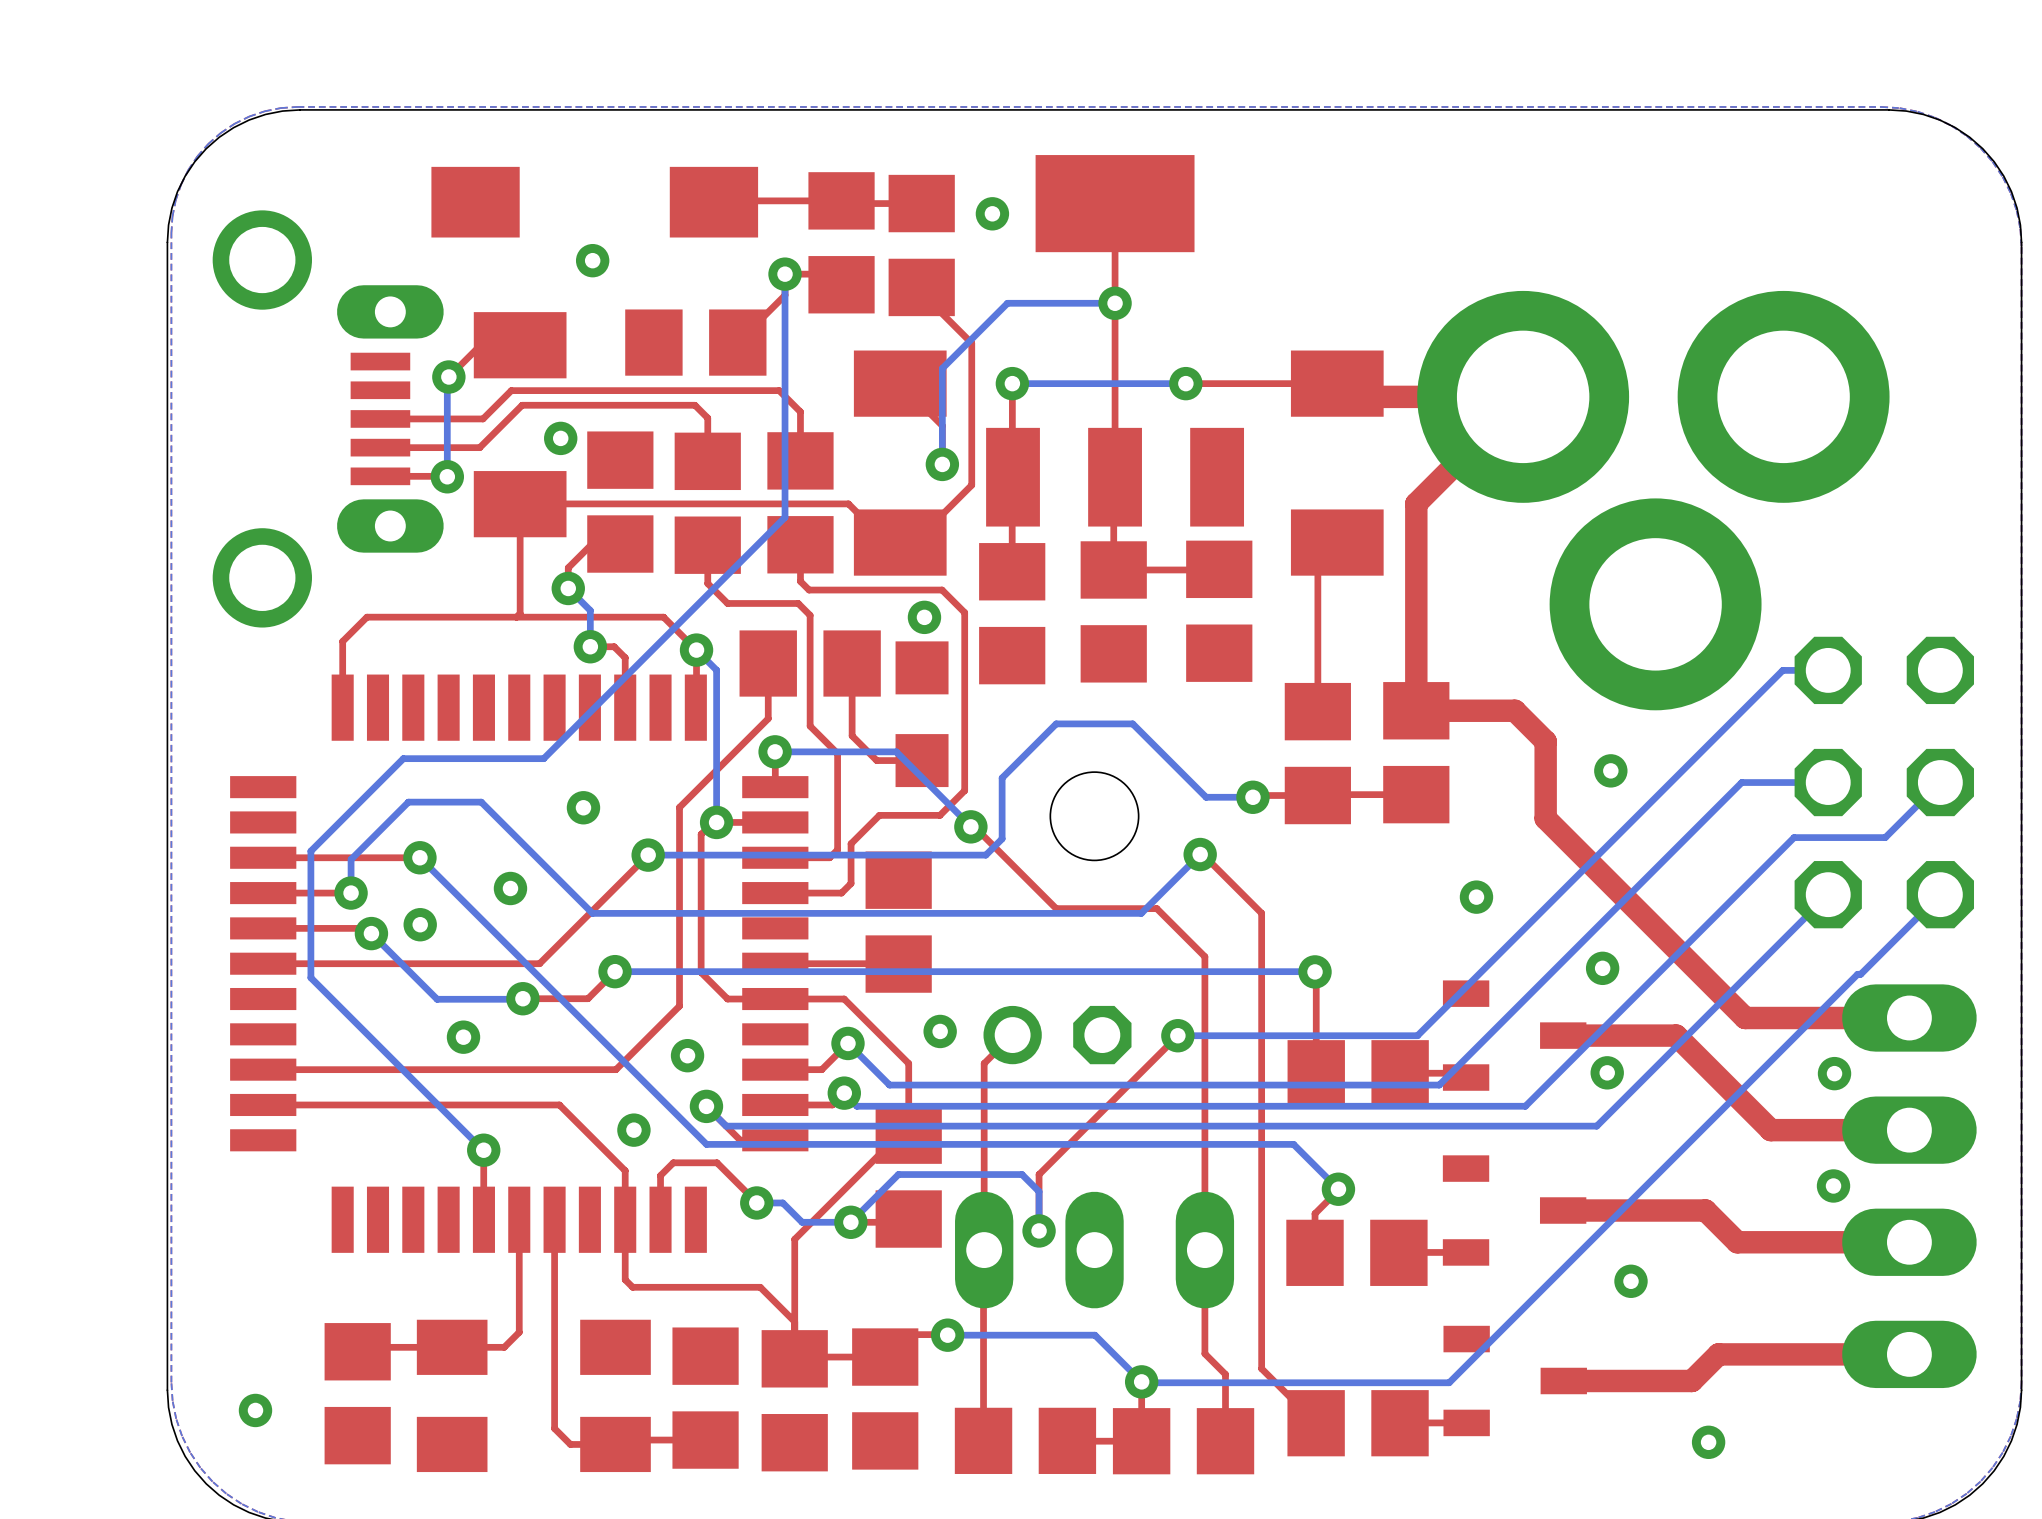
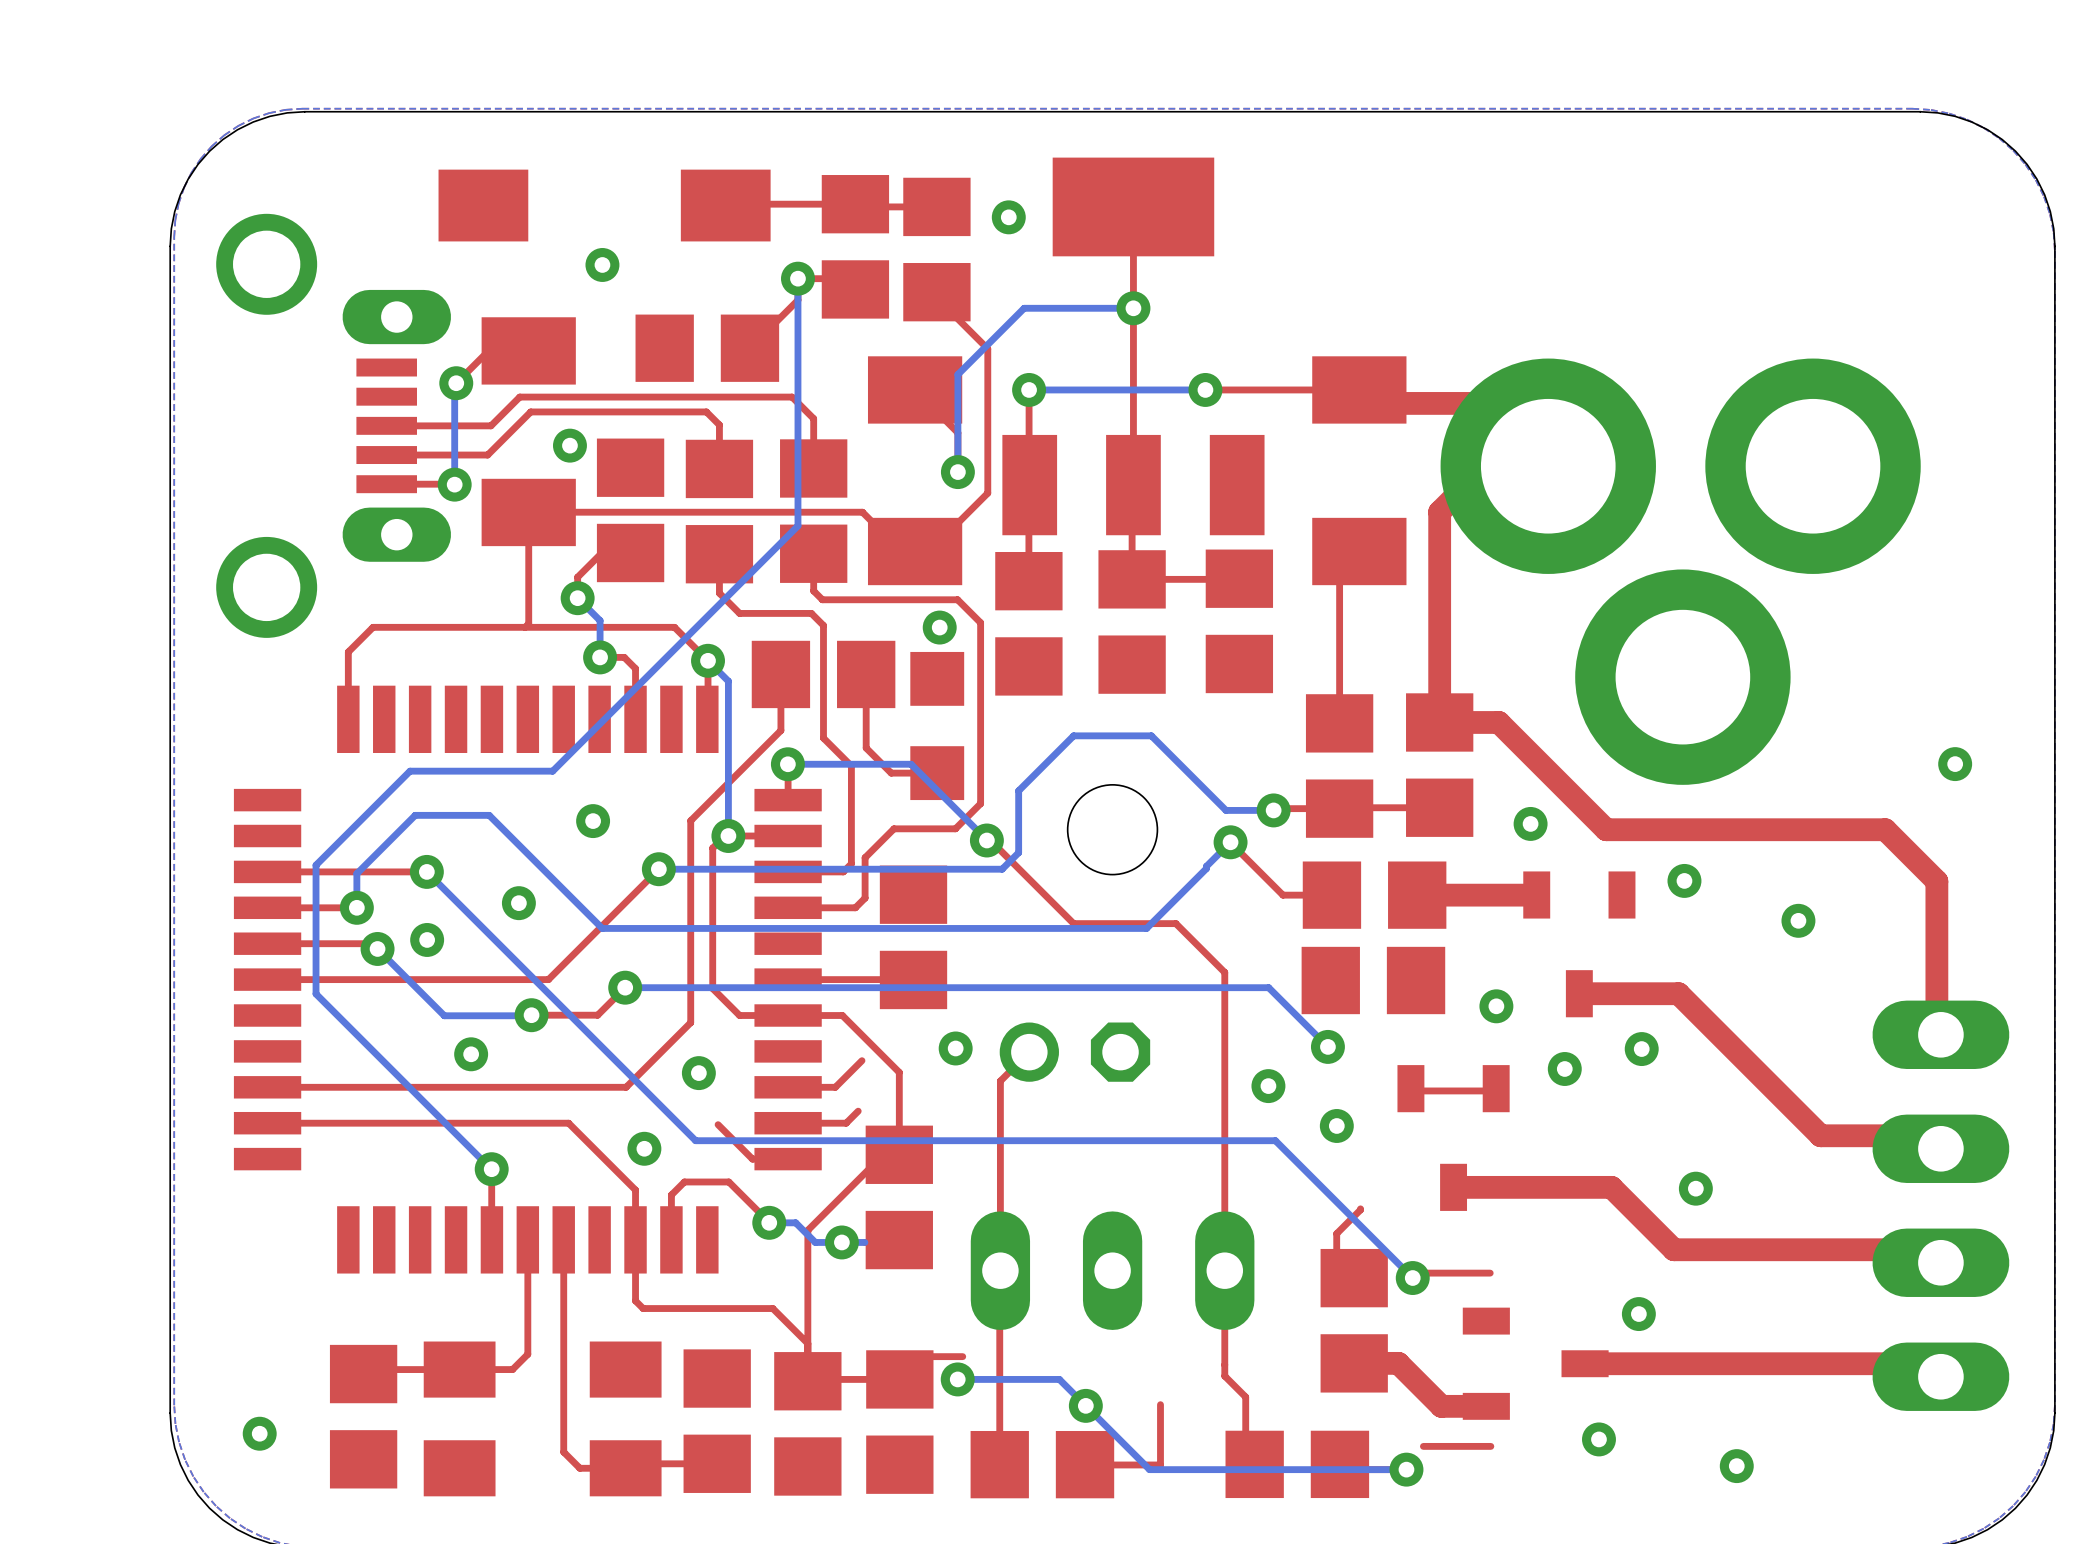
part position: (1653, 500) -> (1680, 571)
bottom track: (1828, 670) (1782, 670) (1417, 1035) (1177, 1035) -> none
top track: (1474, 710) (1514, 710) (1545, 741) (1545, 818) (1745, 1018) (1909, 1018) -> (1498, 722) (1606, 829) (1885, 829) (1936, 881) (1936, 1021)
via: none -> (1955, 764)
via: (1610, 770) -> none
bottom track: (1828, 782) (1741, 782) (1439, 1085) (889, 1085) (847, 1043) -> none
part: (1884, 782) -> none
bottom track: (1940, 782) (1885, 837) (1794, 837) (1525, 1106) (856, 1106) (844, 1093) -> none
via: none -> (1530, 823)
top track: none -> (1230, 842) (1282, 895) (1331, 895)
top track: (1200, 854) (1202, 854) (1261, 913) (1261, 1368) (1316, 1423) -> none
bottom track: (1200, 854) (1141, 913) (1127, 913) -> (1230, 842) (1146, 928)
via position: (1200, 854) -> (1230, 842)
via: none -> (1684, 880)
part: none -> (1374, 895)
top track: none -> (1536, 895) (1417, 895)
bottom track: (1828, 894) (1596, 1126) (726, 1126) (706, 1106) -> none
bottom track: (1940, 894) (1860, 974) (1857, 974) (1449, 1382) (1141, 1382) (1094, 1335) (947, 1335) -> none
via: (1476, 897) -> none
via: none -> (1798, 920)
part: none -> (1579, 944)
part: none -> (1373, 980)
via: (1602, 968) -> none
bottom track: (1314, 971) (1248, 971) -> (1327, 1046) (1268, 987)
top track: (1315, 971) (1316, 1073) -> none
via: (1315, 971) -> none
top track: none -> (1579, 993) (1678, 993) (1820, 1135) (1936, 1135)
via: none -> (1496, 1006)
top track: (828, 999) (844, 999) (908, 1063) (908, 1135) (898, 1135) (794, 1239) -> (842, 1015) (899, 1072) (899, 1154) (883, 1154) (807, 1230) (807, 1259)
via: none -> (1327, 1046)
via: none -> (1641, 1049)
top track: (1177, 1035) (1039, 1174) (1039, 1230) -> none
via: (1177, 1035) -> none
part: (1514, 1035) -> none
top track: (1563, 1035) (1676, 1035) (1770, 1130) (1909, 1130) -> none
via: (847, 1043) -> none
via: none -> (1564, 1068)
via: none -> (1268, 1086)
via: (1607, 1072) -> none
part: (1358, 1073) -> none
via: (1834, 1073) -> none
via: (844, 1093) -> none
via: (706, 1106) -> none
via: none -> (1336, 1125)
part: none -> (1453, 1138)
bottom track: (684, 1122) (706, 1144) (1293, 1144) (1338, 1189) -> (695, 1140) (1275, 1140) (1412, 1278)
top track: none -> (1453, 1187) (1611, 1187) (1673, 1249) (1936, 1249)
via: none -> (1695, 1188)
part position: (908, 1177) -> (899, 1197)
via: (1833, 1185) -> none
via: (1338, 1189) -> none
part: (1514, 1210) -> none
top track: (1563, 1210) (1705, 1210) (1737, 1242) (1909, 1242) -> none
bottom track: (850, 1222) (898, 1174) (1022, 1174) (1039, 1191) (1039, 1230) -> none
via position: (850, 1222) -> (841, 1242)
via: (1039, 1230) -> none
part rotation: 0° (1356, 1252) -> 90° clockwise (1354, 1320)
via: none -> (1412, 1278)
via position: (1631, 1281) -> (1638, 1314)
via position: (947, 1335) -> (957, 1379)
top track: none -> (1354, 1363) (1398, 1363) (1441, 1406) (1486, 1406)
top track: none -> (1936, 1363) (1585, 1363)
top track: (1909, 1354) (1718, 1354) (1691, 1380) (1563, 1380) -> none
bottom track: none -> (957, 1379) (1059, 1379) (1149, 1469) (1406, 1469)
part position: (1515, 1380) -> (1535, 1363)
via: (1141, 1381) -> none
via: none -> (1085, 1405)
via: none -> (1598, 1439)
part: (1358, 1423) -> none
part: none -> (1297, 1464)
part: (1183, 1441) -> none
via: none -> (1406, 1469)

